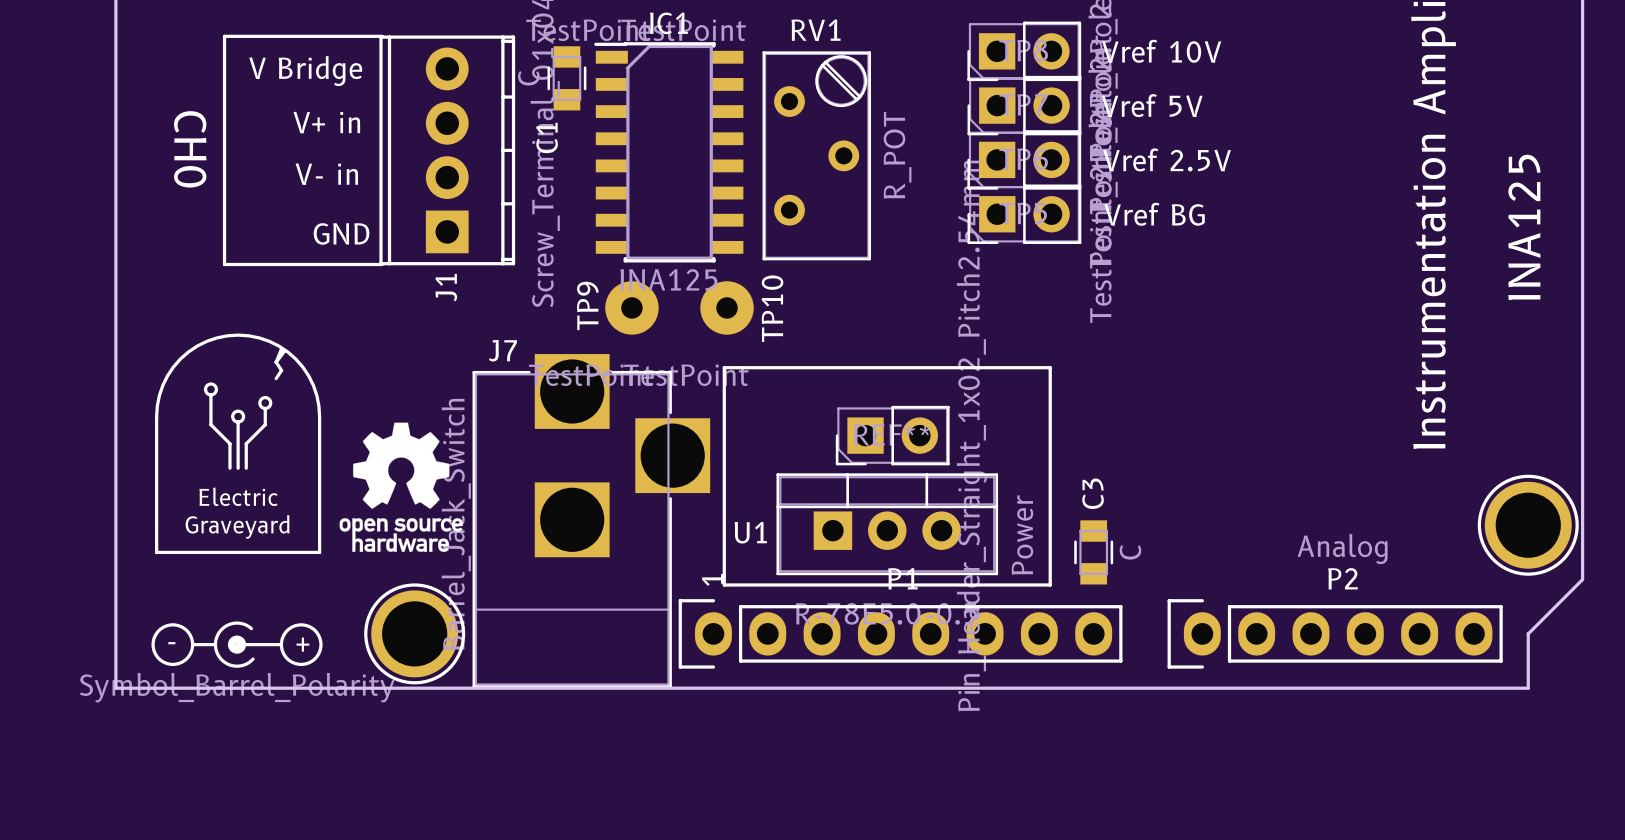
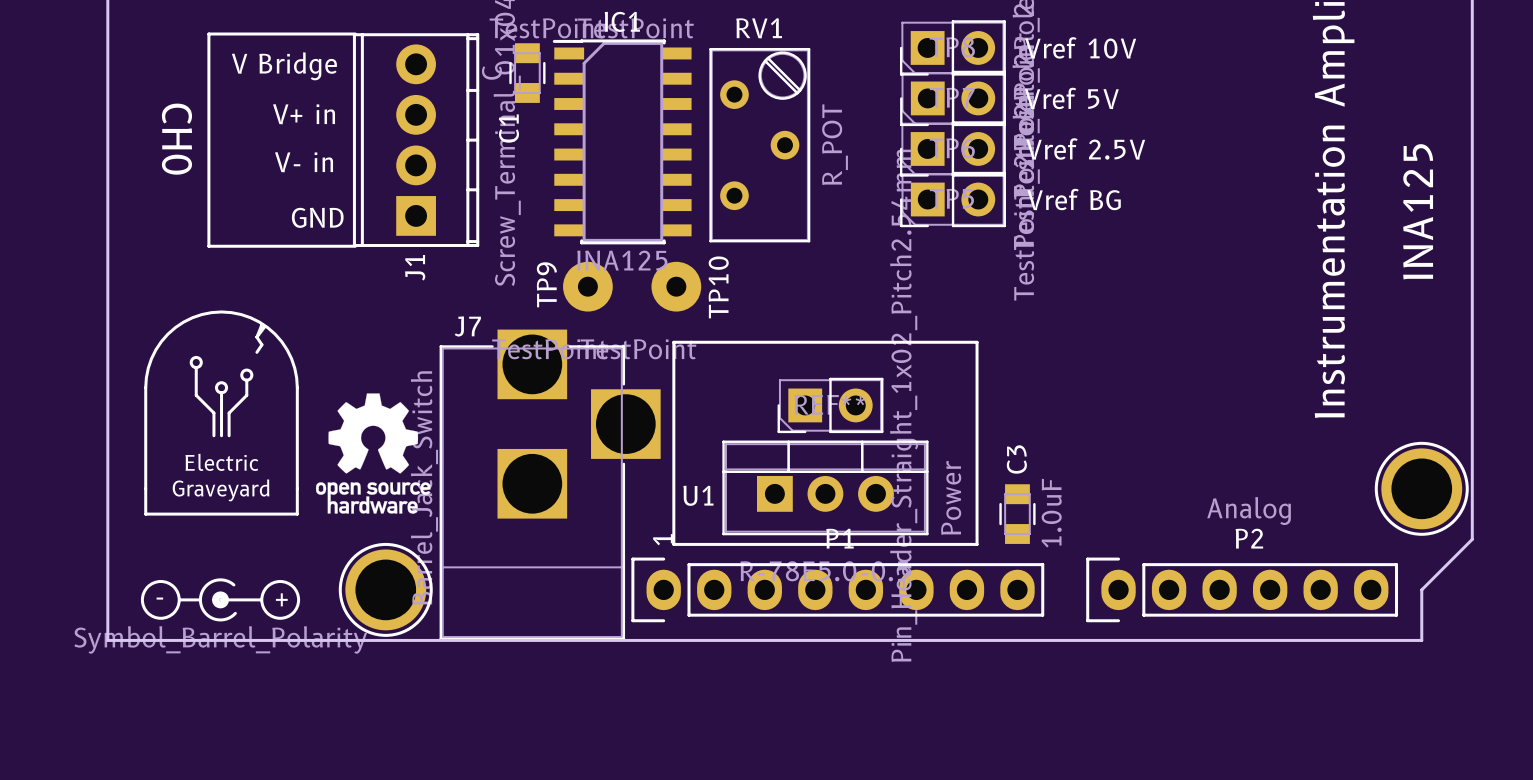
C3 value: C (1130, 552) -> 1.0uF (1051, 513)

